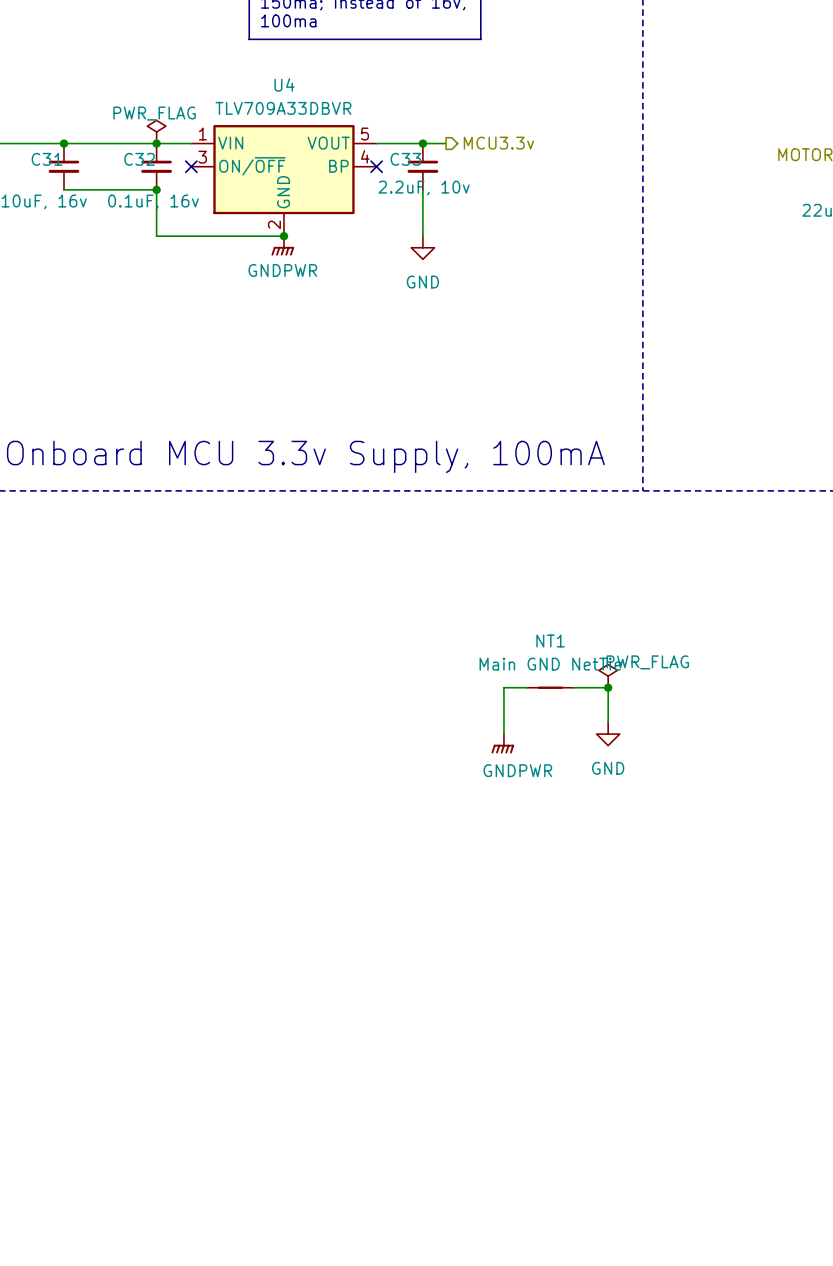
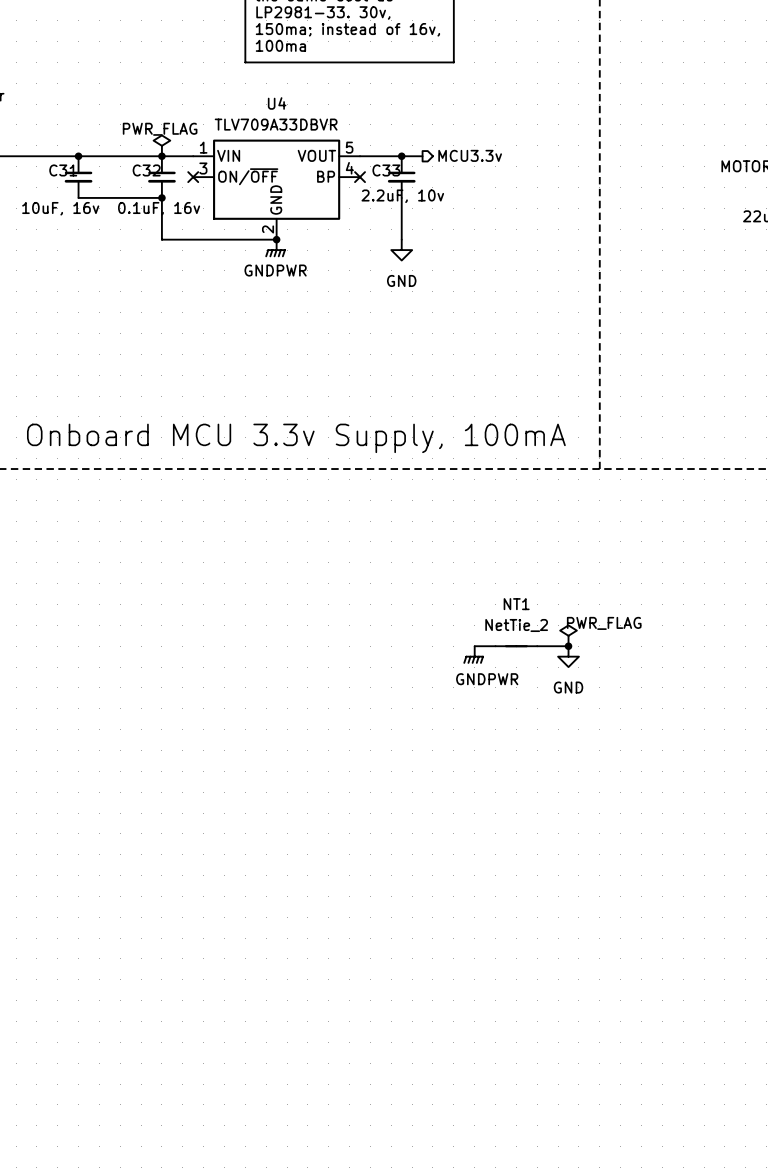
NT1 value: Main GND NetTie (550, 664) -> NetTie_2 (516, 625)
wire: (503, 687) (503, 734) -> none
wire: (608, 687) (608, 722) -> none
power symbol position: GND (608, 734) -> GND (568, 656)
power symbol position: GNDPWR (502, 743) -> GNDPWR (473, 654)

